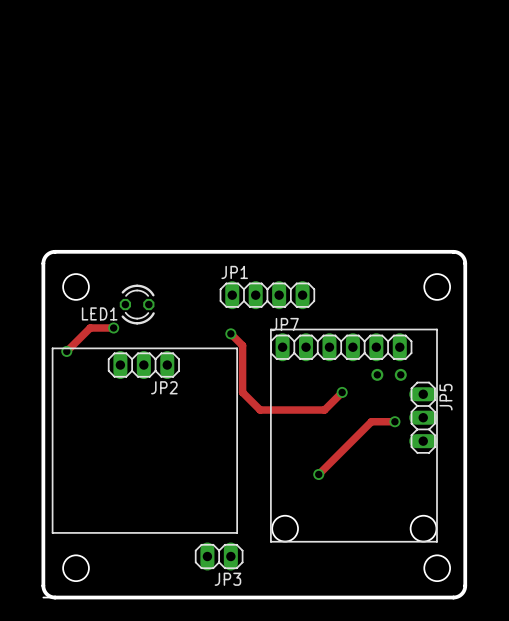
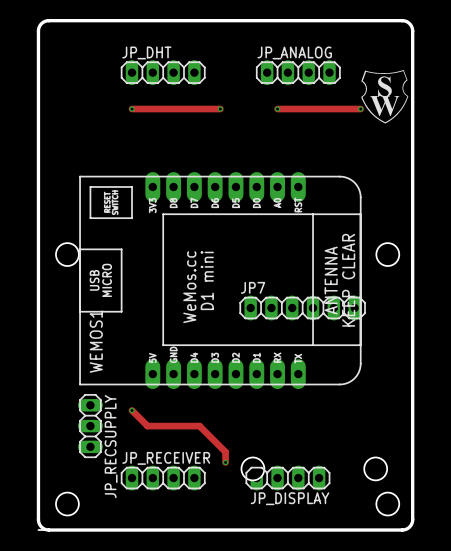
drawing: none -> [361, 69, 409, 124]
JP_DHT: none -> (163, 72)
JP_ANALOG: none -> (298, 72)
track: none -> (132, 109) (220, 109)
via: none -> (132, 109)
via: none -> (220, 109)
track: none -> (277, 109) (360, 109)
via: none -> (277, 109)
via: none -> (360, 109)
board edge: (43, 263) (46, 255) (55, 251) (453, 251) (461, 255) (465, 263) -> (38, 233) (38, 31) (41, 23) (48, 20) (407, 22) (412, 31) (412, 233)
JP1: (267, 295) -> none
LED1: (137, 304) -> none
WEMOS1: none -> (220, 280)
track: (113, 327) (90, 327) (66, 351) -> none
via: (113, 327) -> none
line: (270, 329) (437, 329) (437, 541) (270, 541) (270, 329) -> none
track: (230, 333) (242, 345) (242, 392) (260, 410) (324, 410) (342, 392) -> none
via: (230, 333) -> none
line: (52, 348) (237, 348) (237, 532) (52, 532) (52, 348) -> none
via: (66, 351) -> none
JP2: (143, 365) -> none
via: (377, 374) -> none
via: (400, 374) -> none
via: (342, 392) -> none
JP5: (423, 417) -> none
track: (394, 421) (371, 421) (318, 474) -> none
via: (394, 421) -> none
track: none -> (132, 410) (147, 426) (199, 426) (225, 452) (225, 462)
via: none -> (132, 410)
via: (318, 474) -> none
JP_RECSUPPLY: none -> (90, 426)
via: none -> (225, 462)
JP_RECEIVER: none -> (163, 478)
JP_DISPLAY: none -> (287, 478)
JP3: (219, 556) -> none

